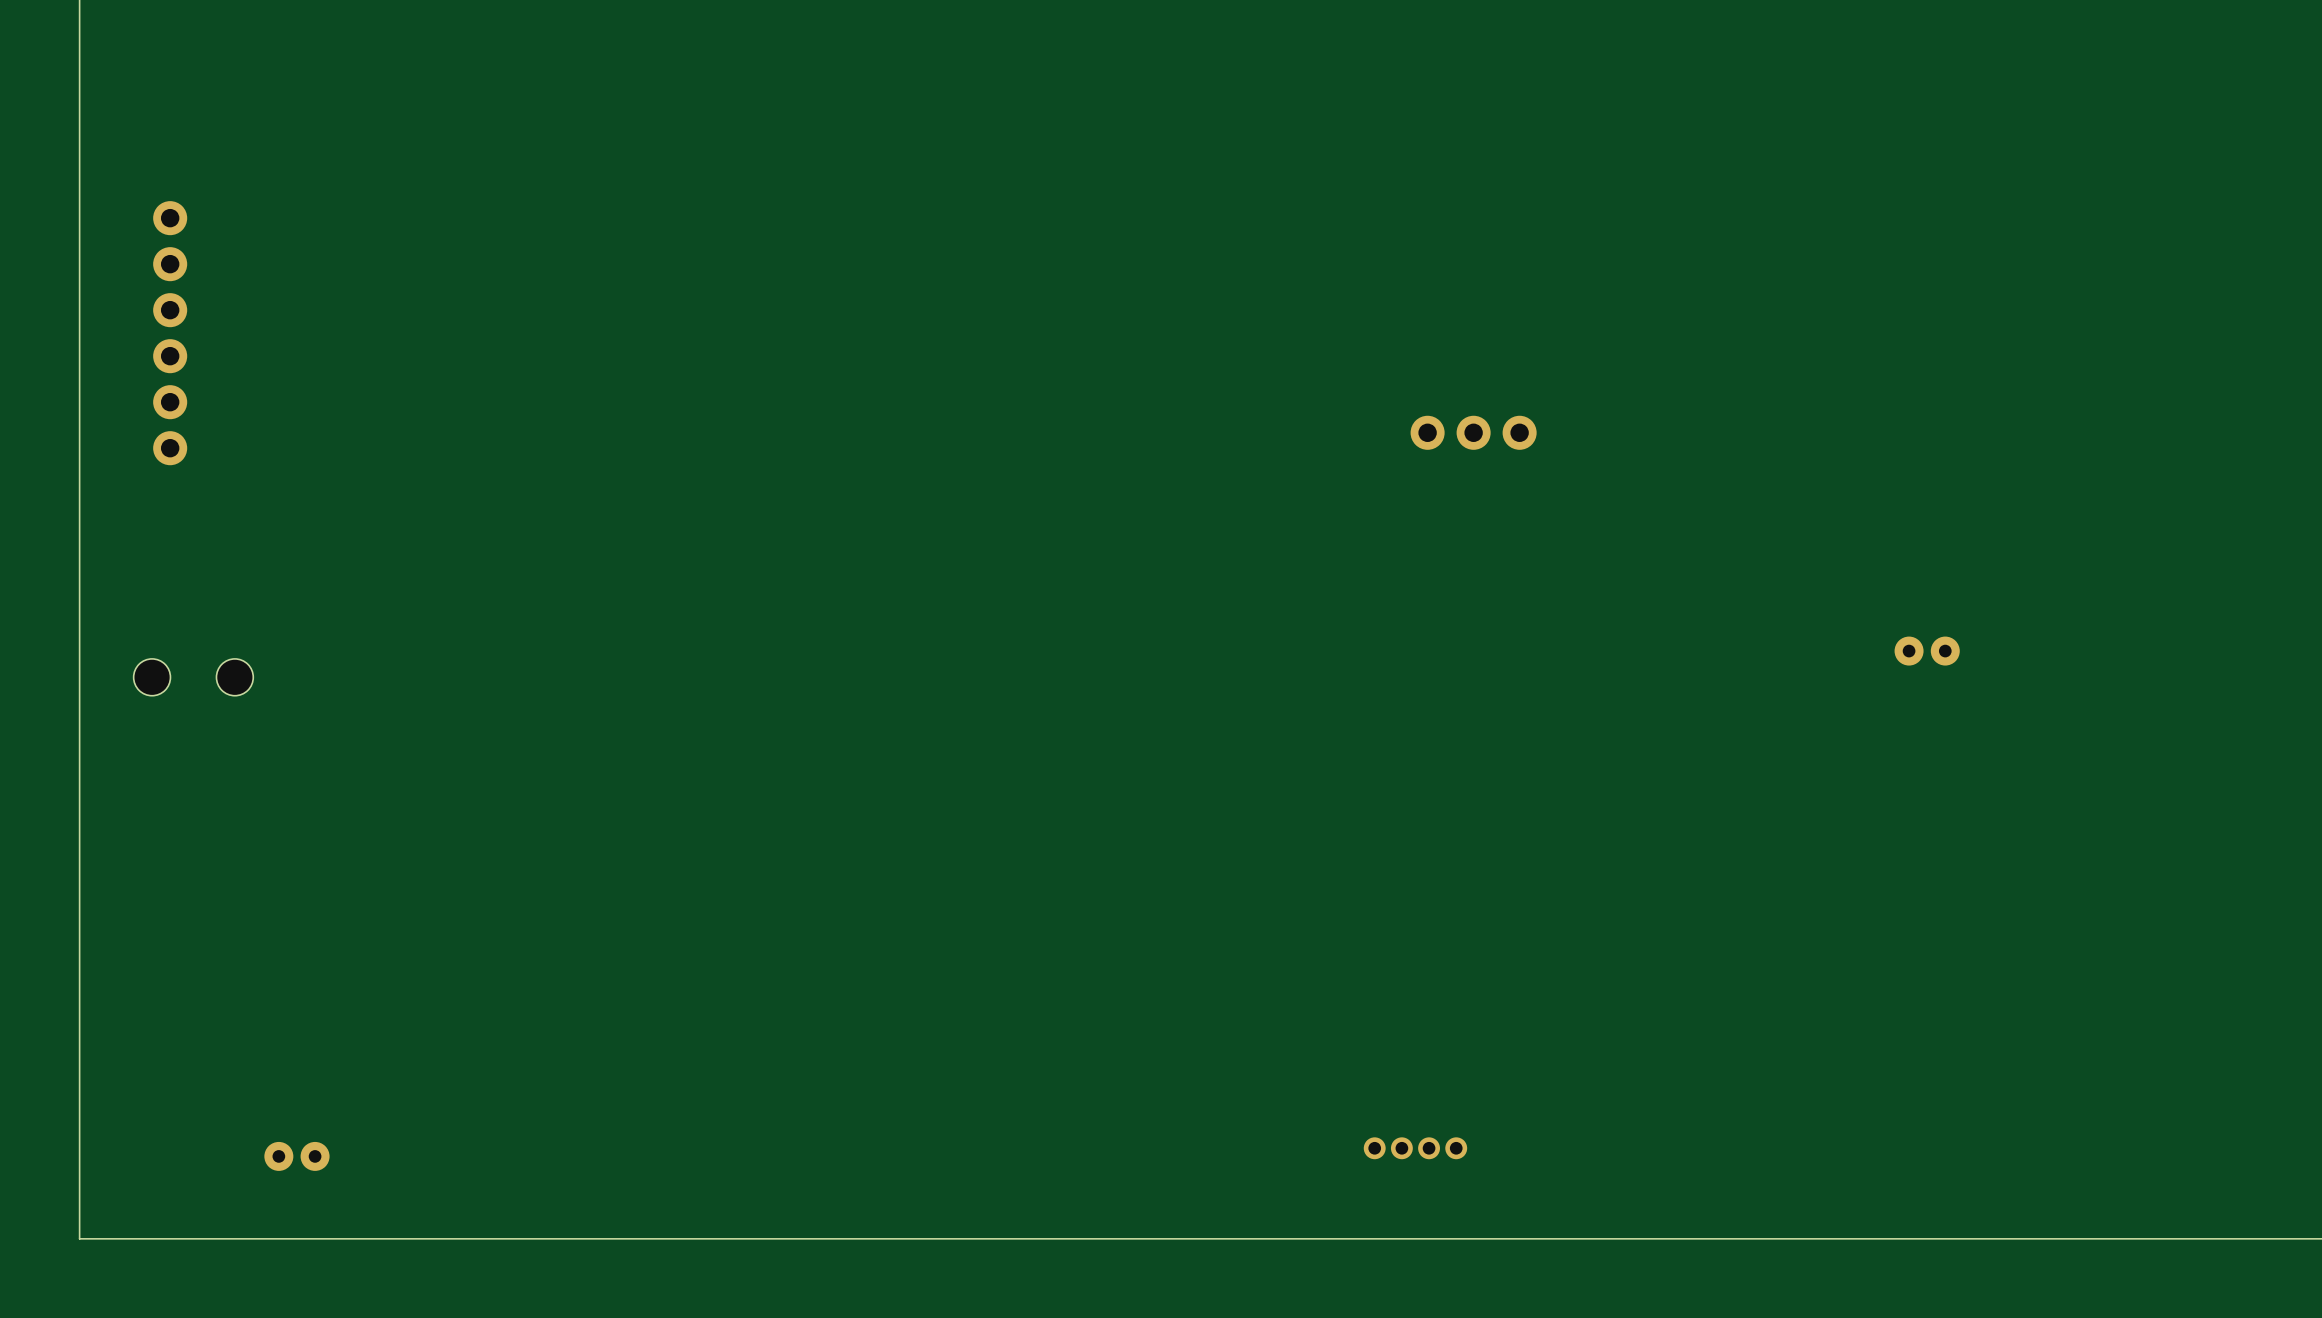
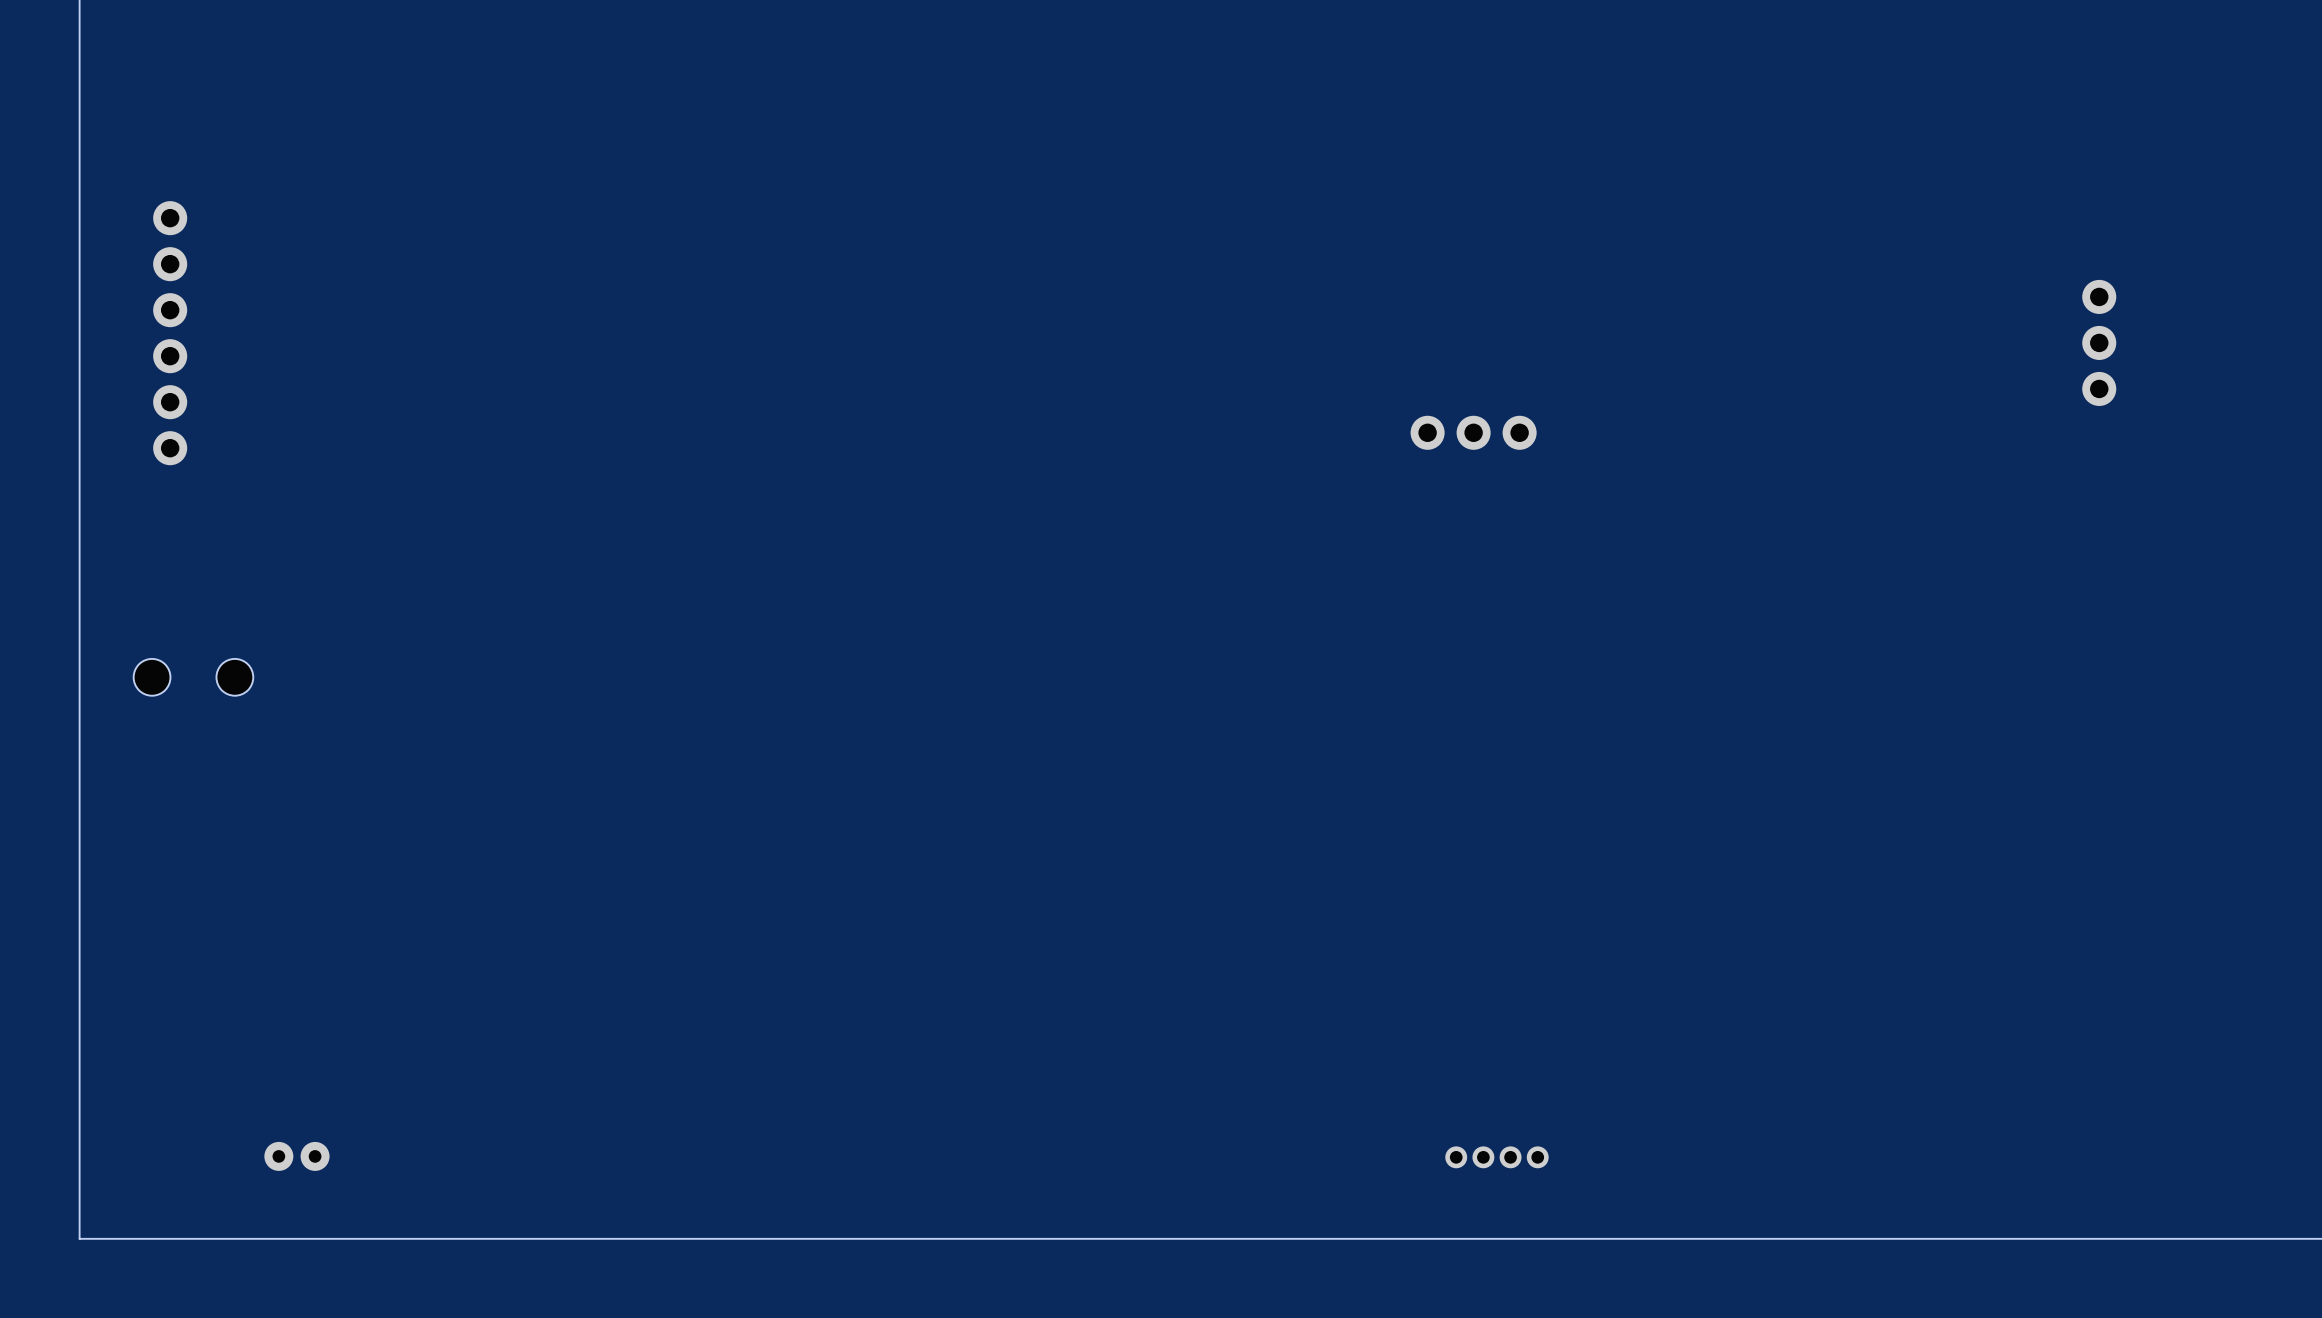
part: none -> (2099, 342)
part: (1927, 651) -> none
part position: (1415, 1148) -> (1496, 1157)

